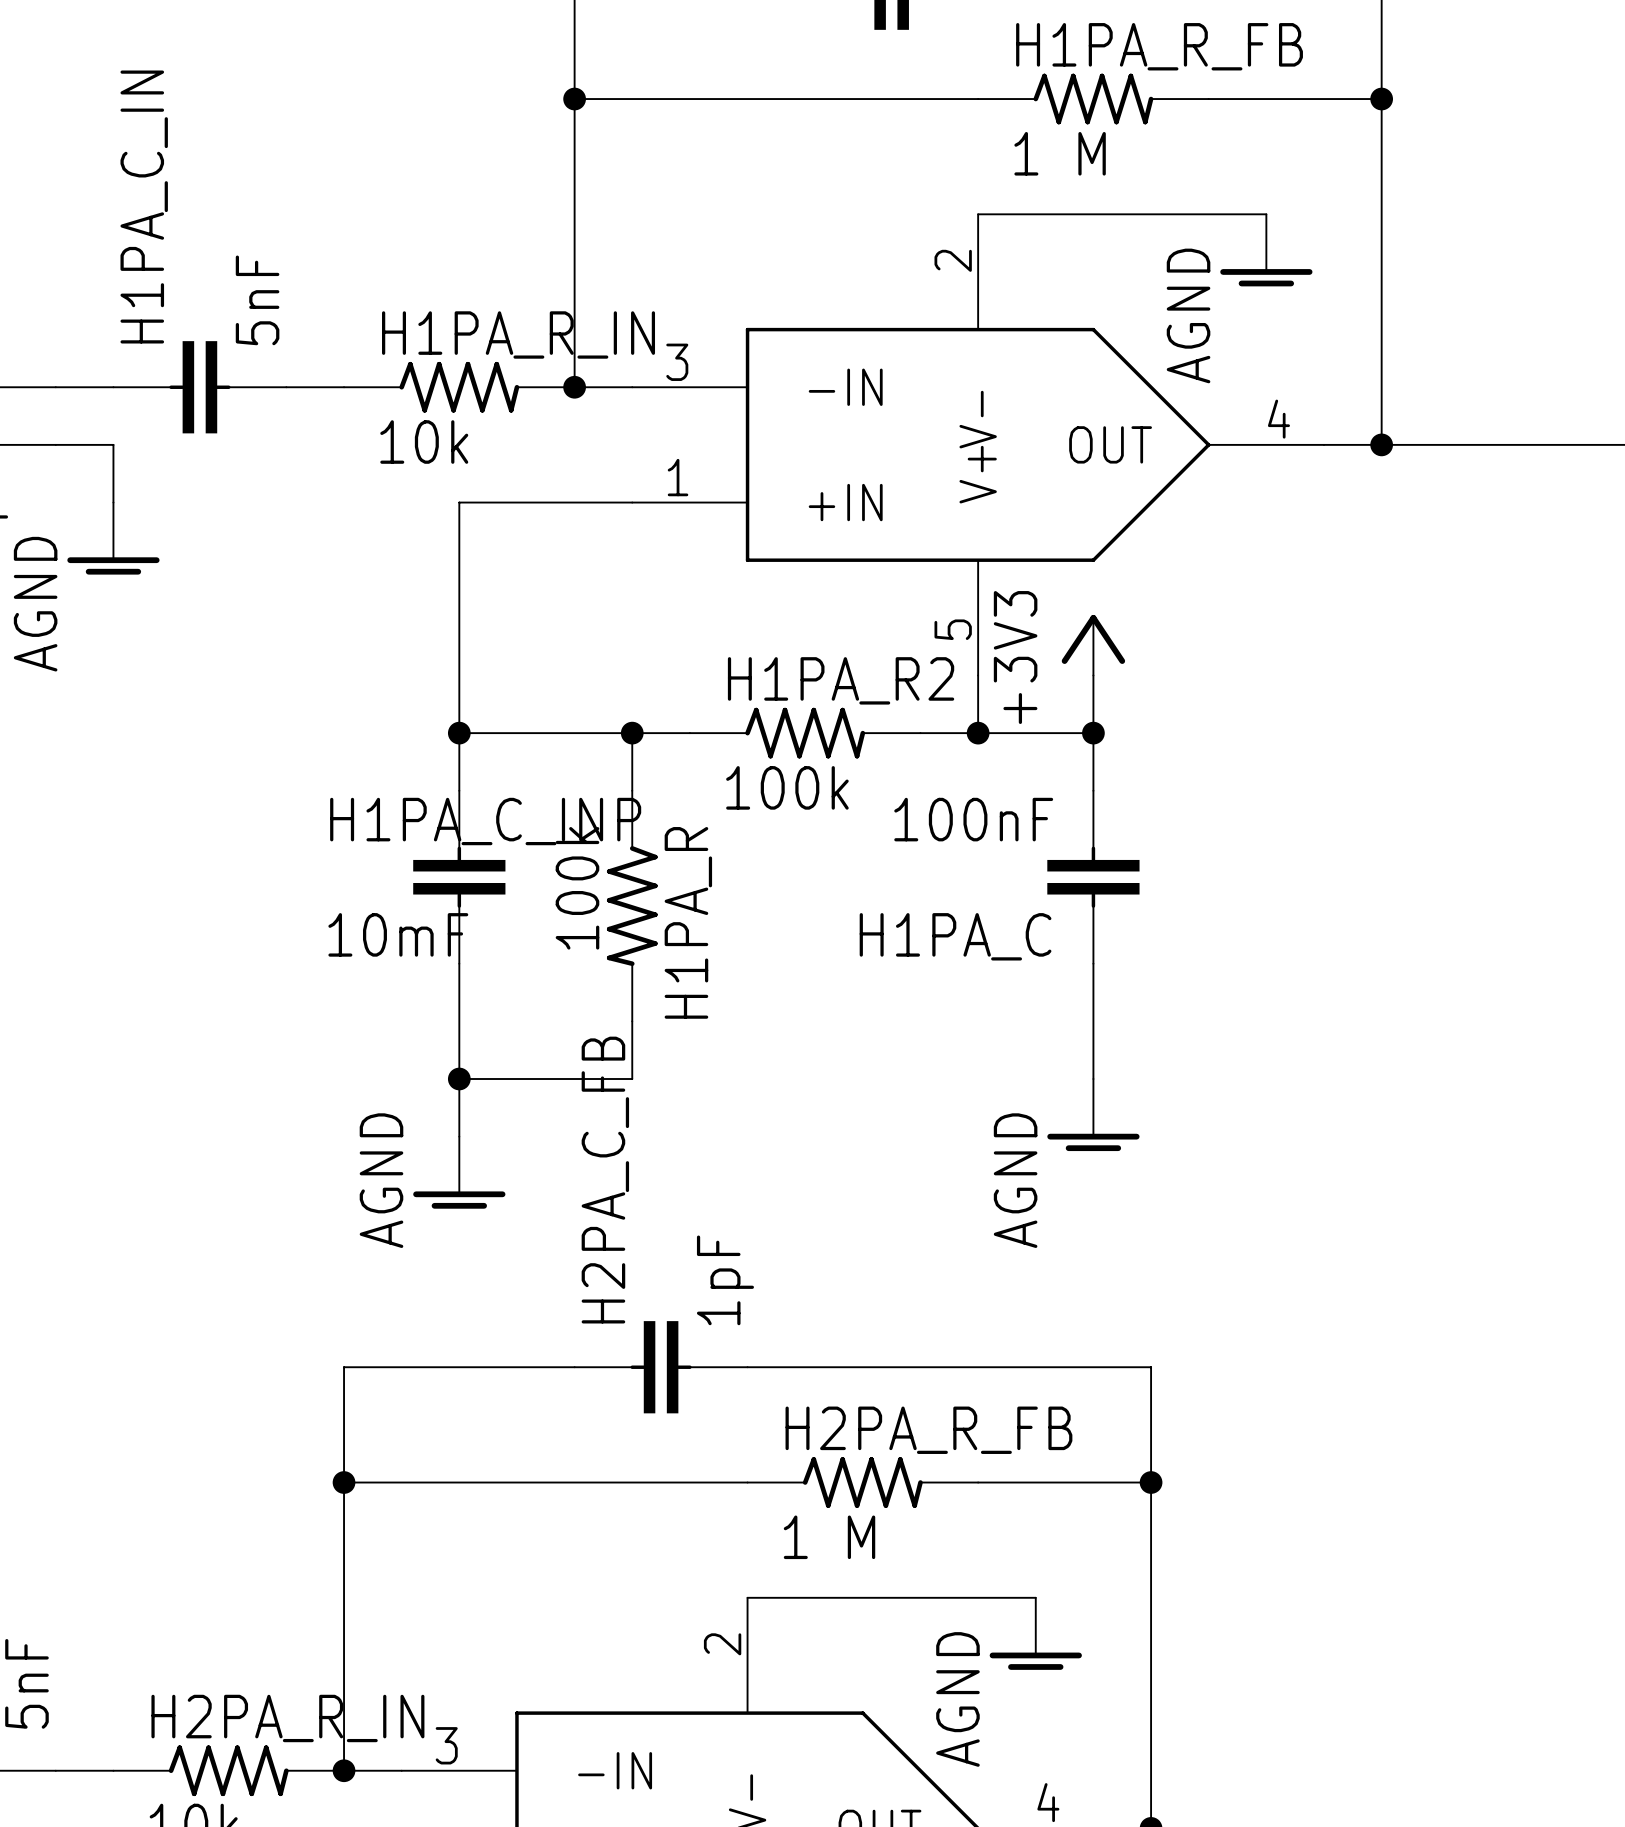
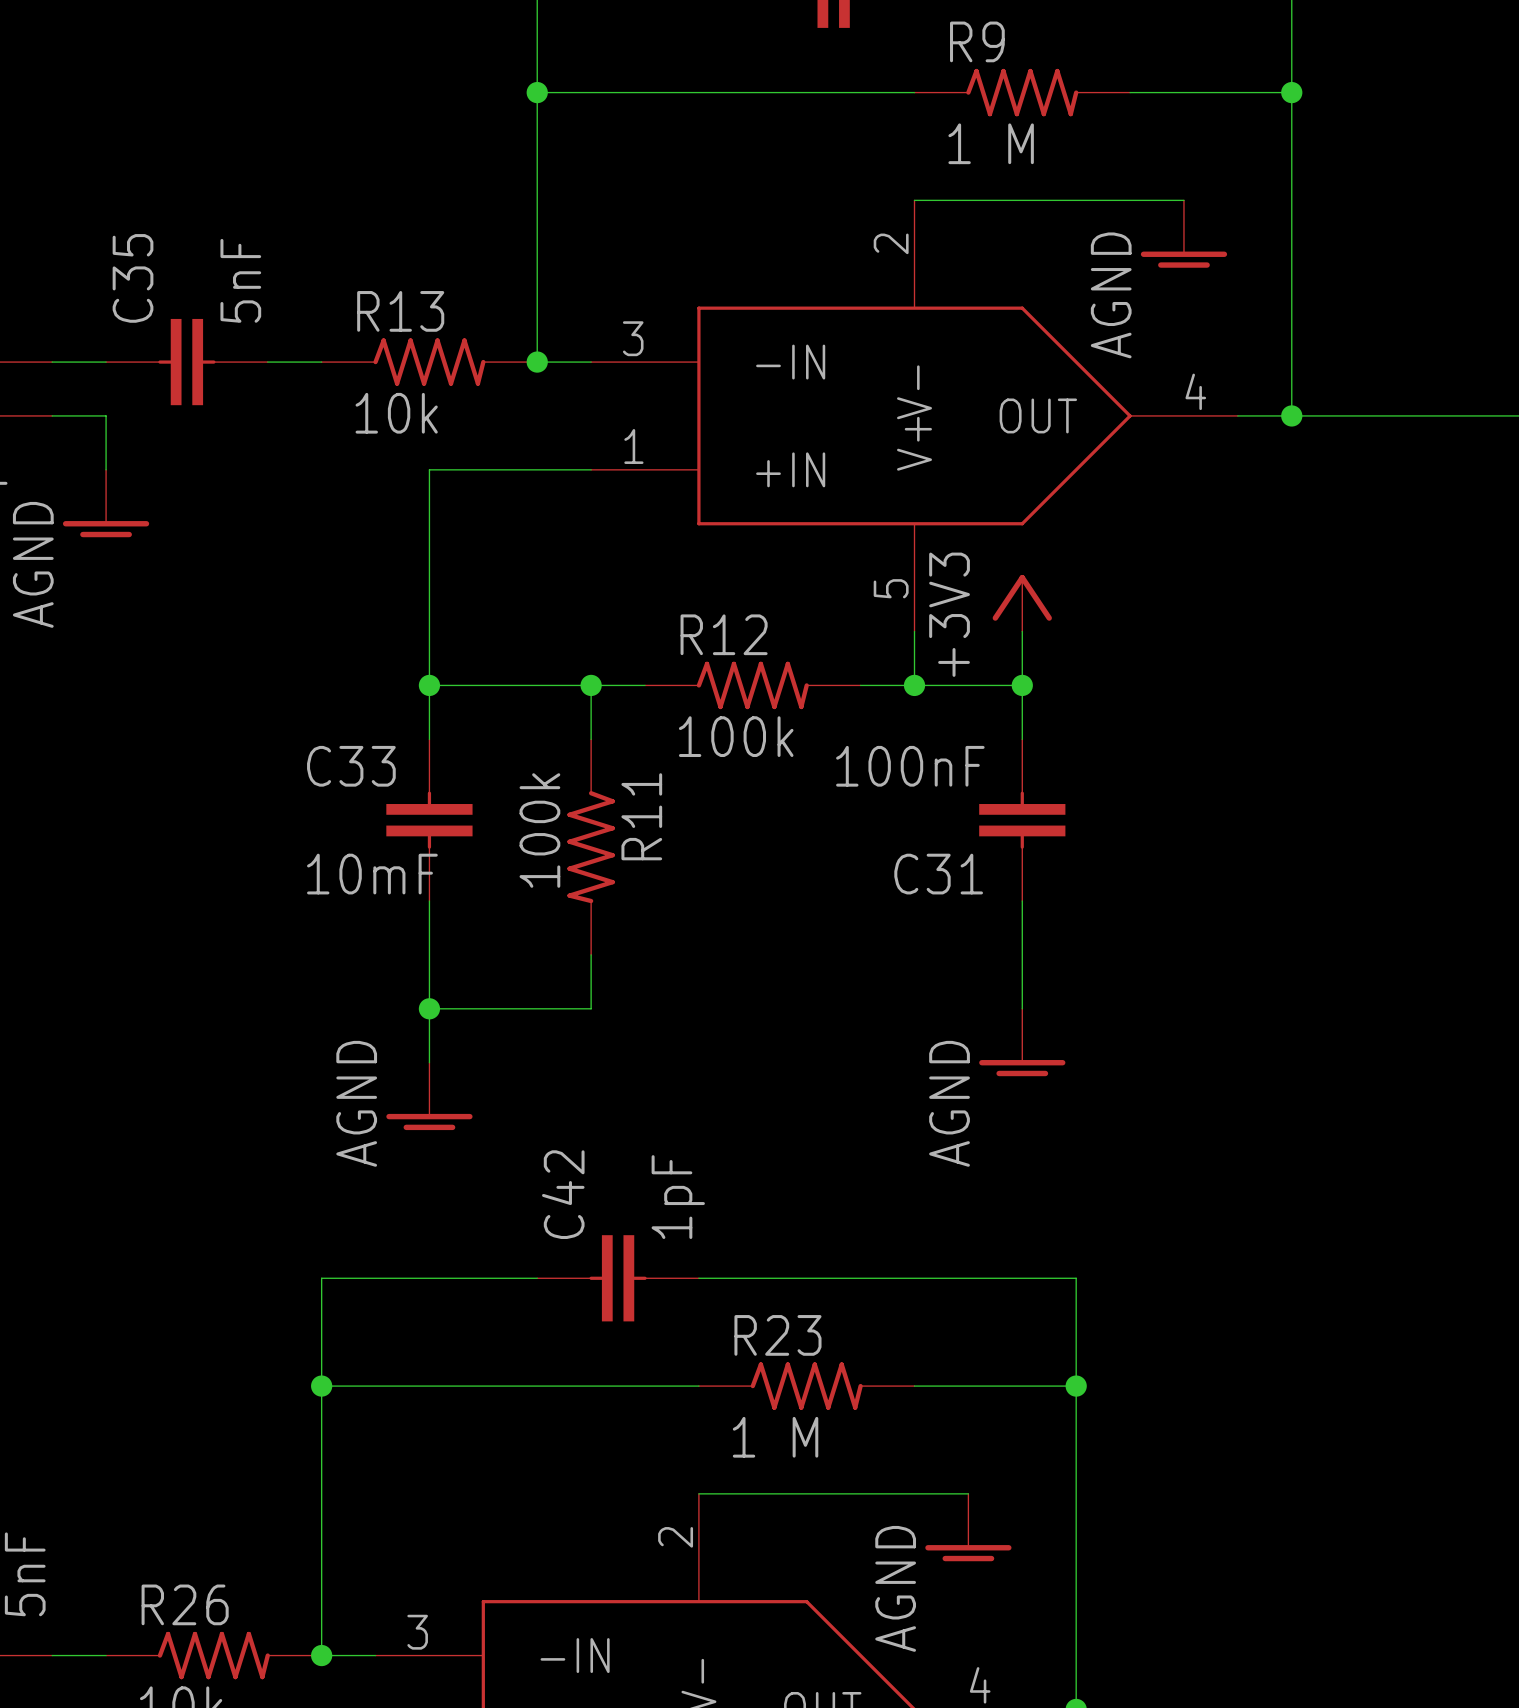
H1PA_R_FB name: H1PA_R_FB (1159, 46) -> R9 (977, 41)
H1PA_C_IN name: H1PA_C_IN (144, 207) -> C35 (133, 278)
H1PA_R_IN name: H1PA_R_IN (518, 334) -> R13 (400, 311)
H1PA_R2 name: H1PA_R2 (841, 680) -> R12 (724, 634)
H1PA_C_INP name: H1PA_C_INP (485, 821) -> C33 (351, 766)
H1PA_R name: H1PA_R (688, 922) -> R11 (641, 816)
H1PA_C name: H1PA_C (955, 936) -> C31 (938, 874)
H2PA_C_FB name: H2PA_C_FB (605, 1180) -> C42 (563, 1194)
H2PA_R_FB name: H2PA_R_FB (928, 1430) -> R23 (777, 1335)
H2PA_R_IN name: H2PA_R_IN (287, 1718) -> R26 (185, 1604)

